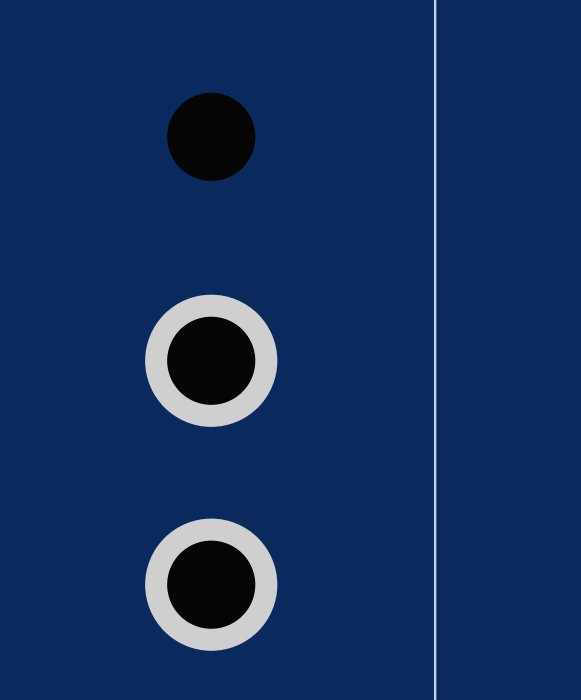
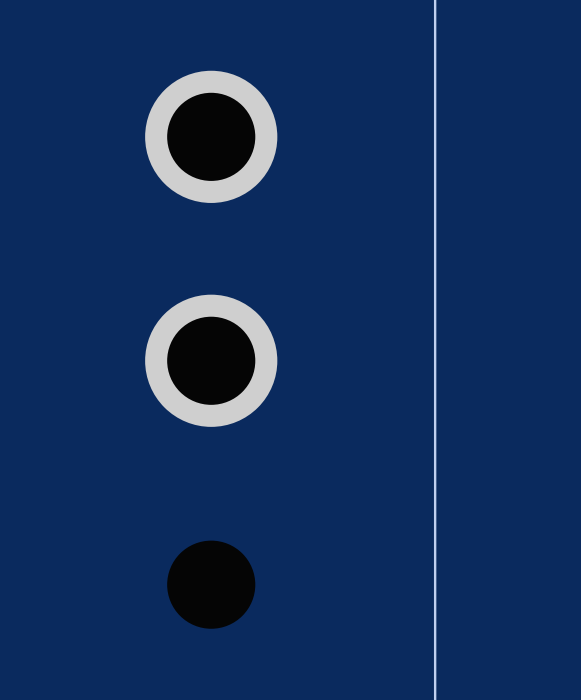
part rotation: 0° (211, 371) -> 180° (211, 349)

